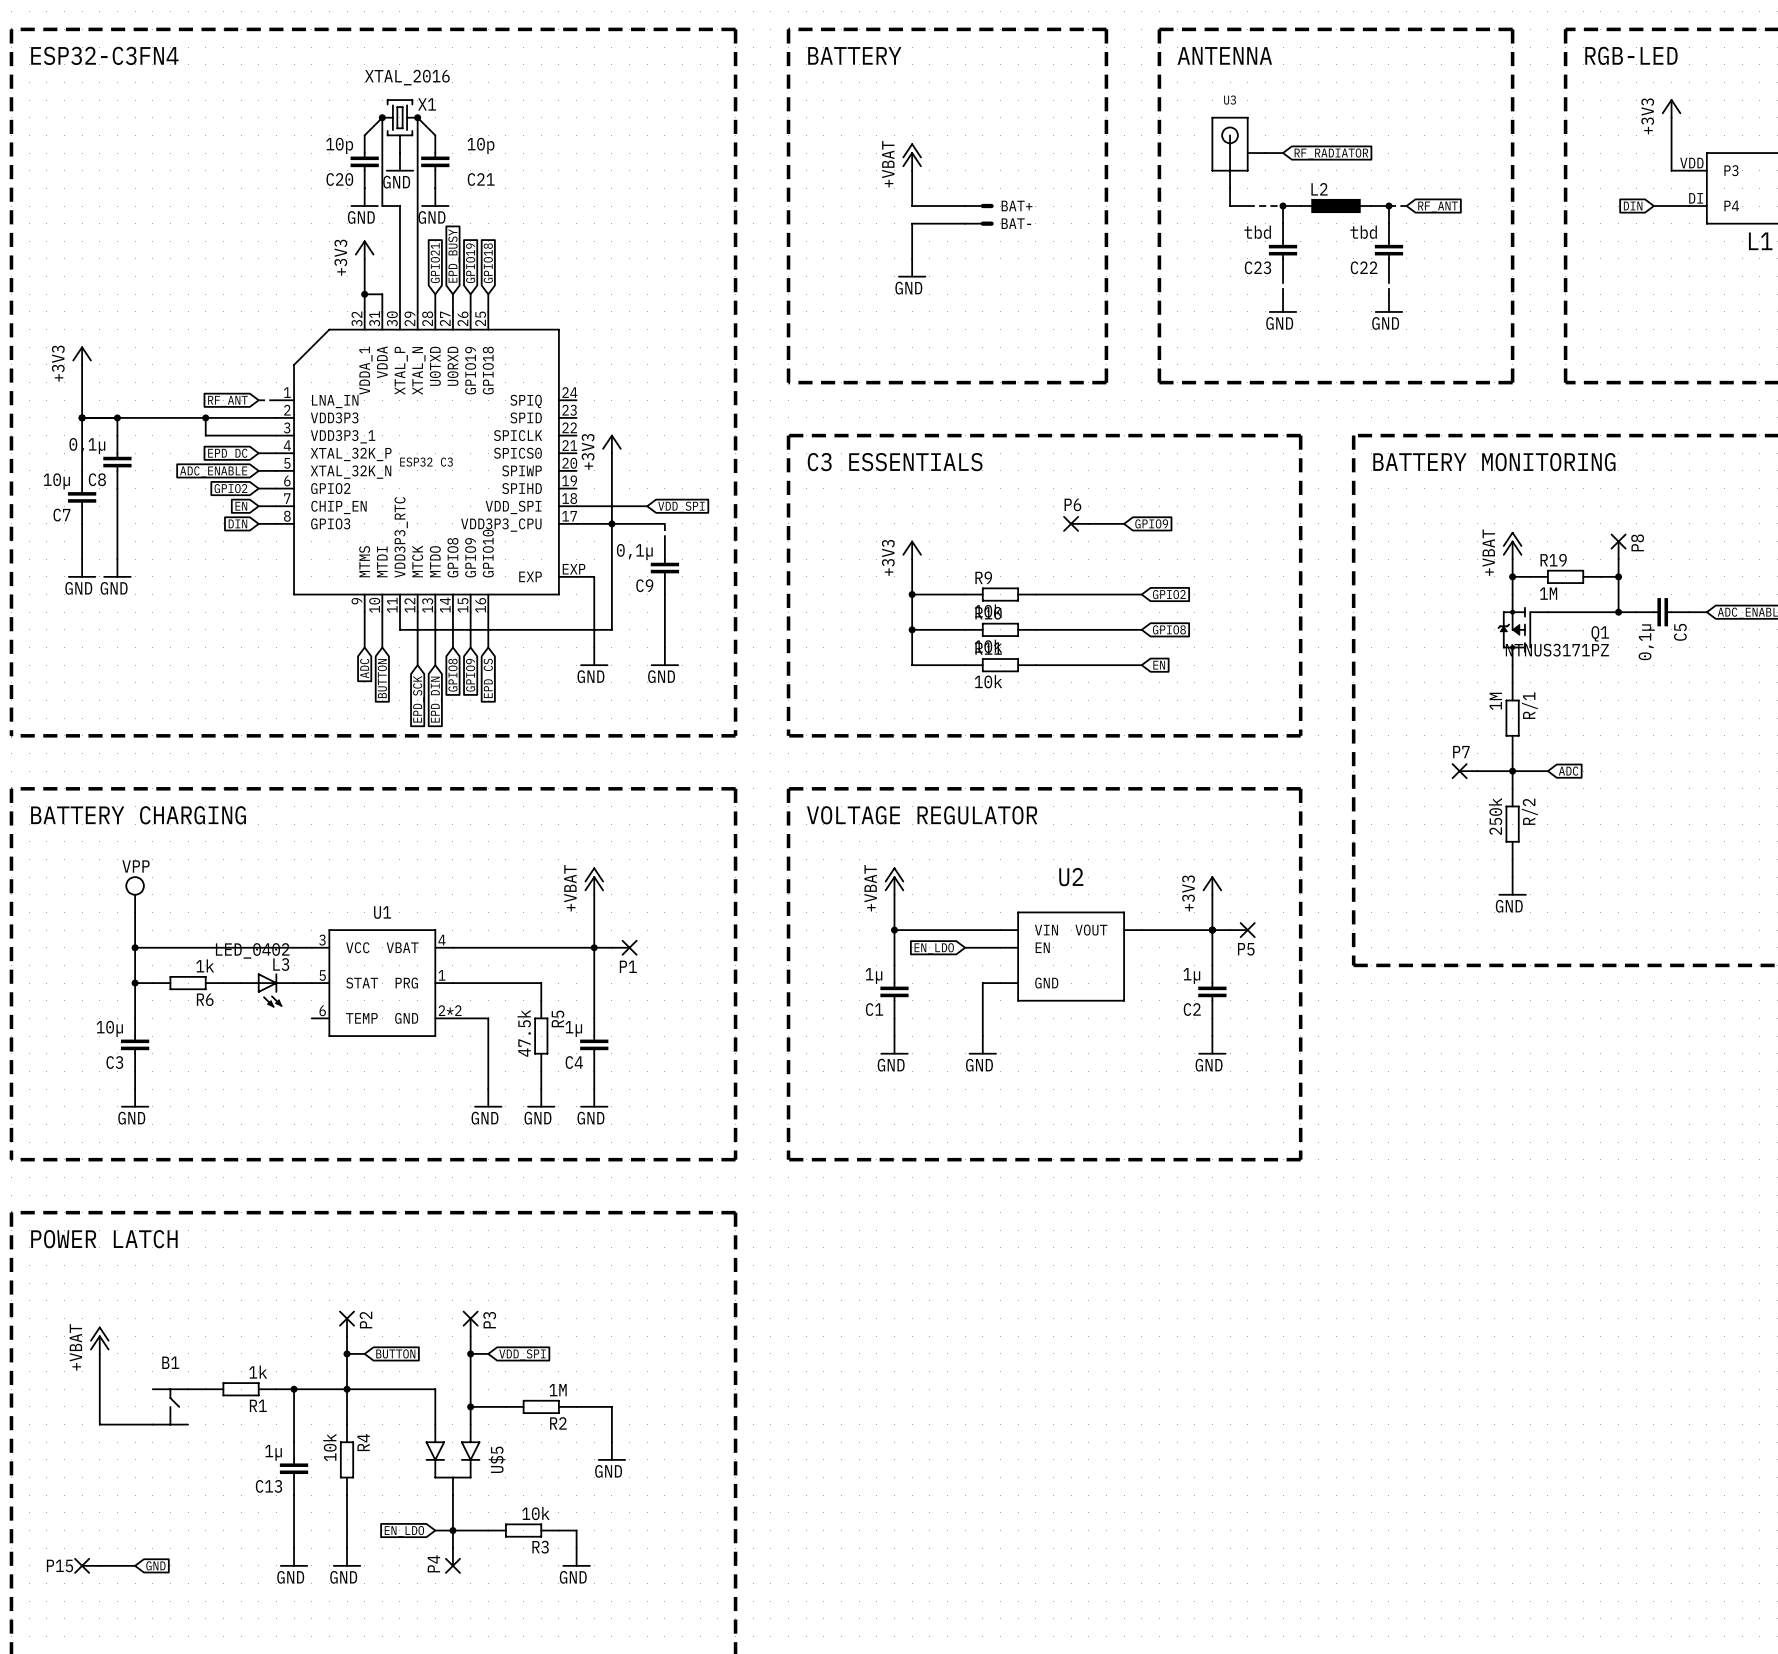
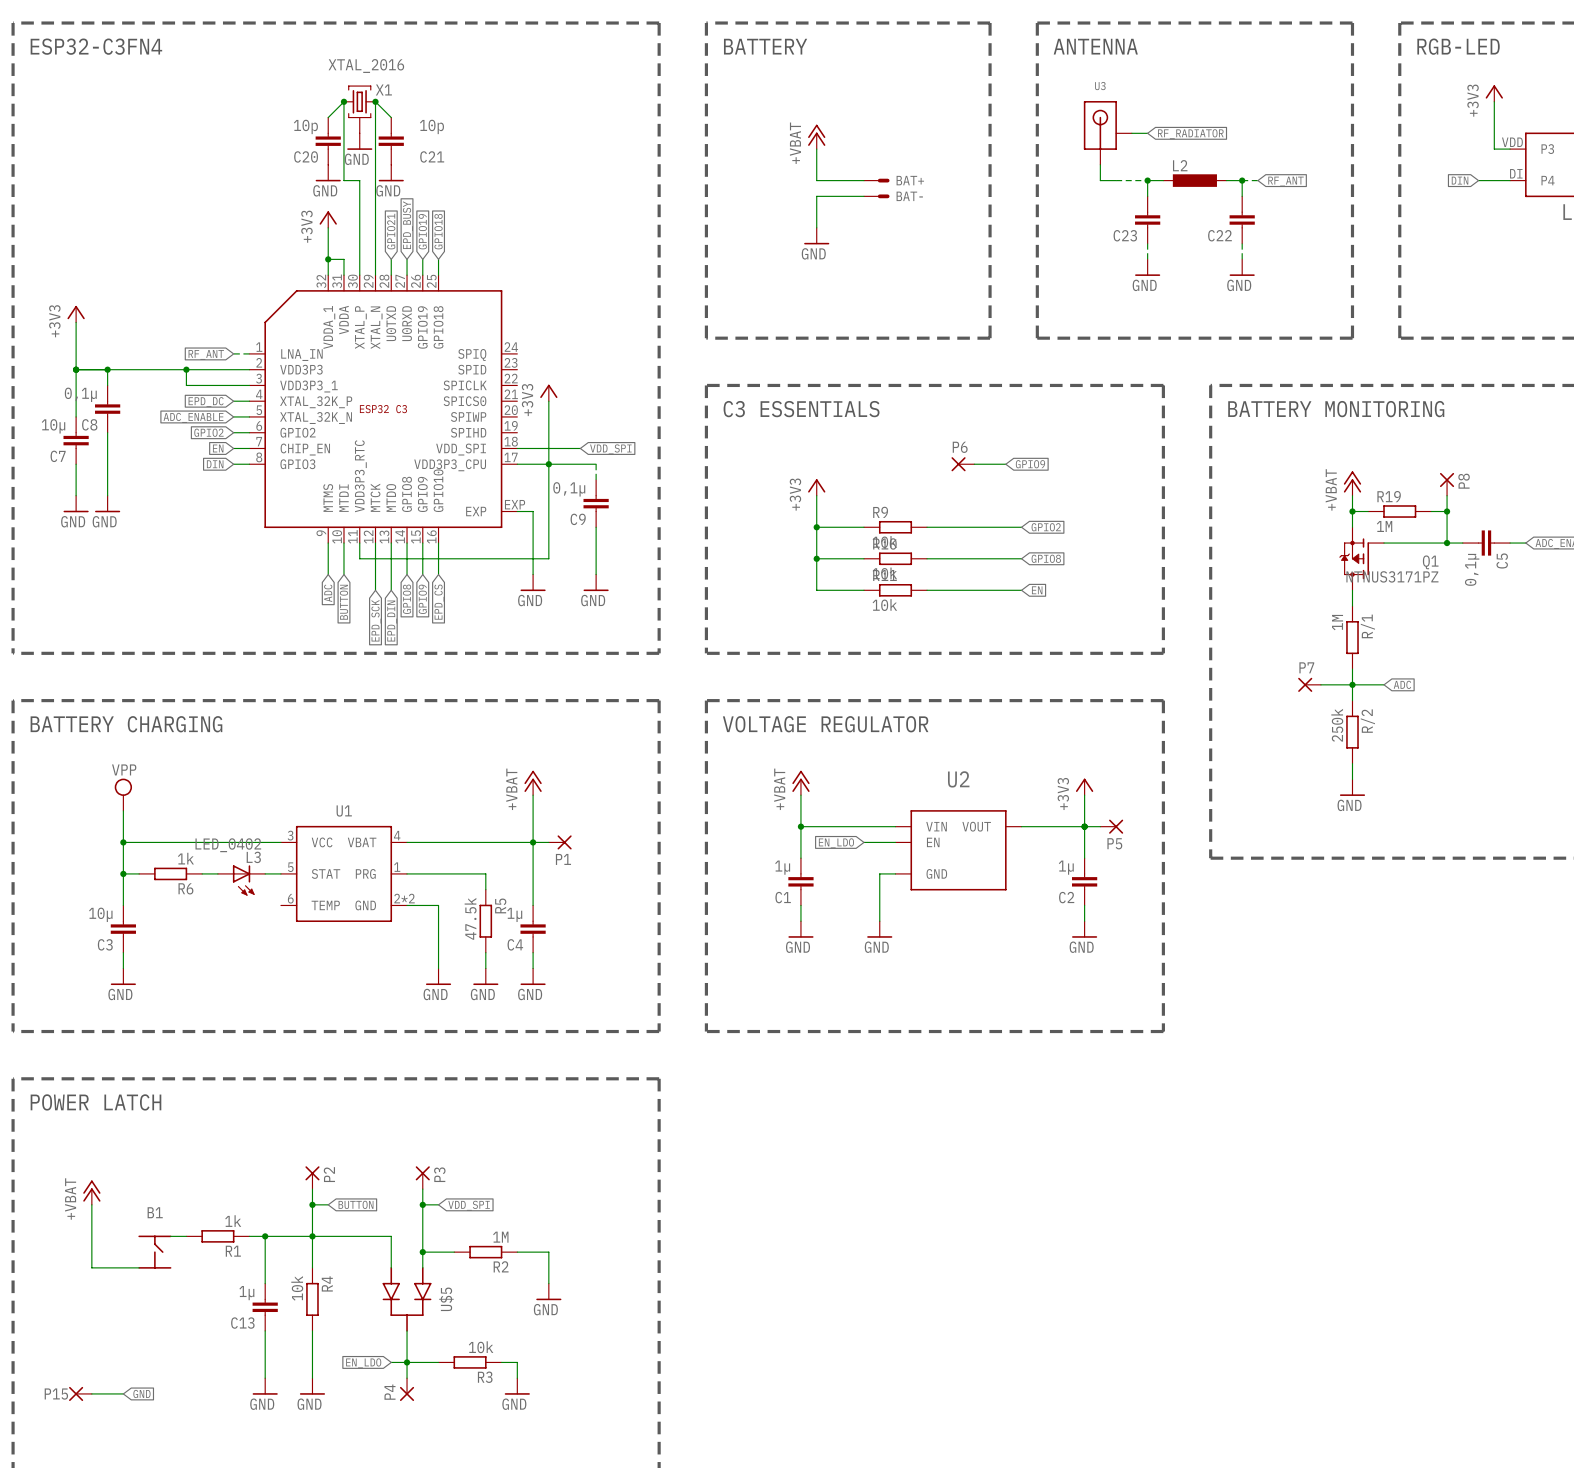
C23 value: tbd (1257, 232) -> none
C22 value: tbd (1363, 232) -> none

